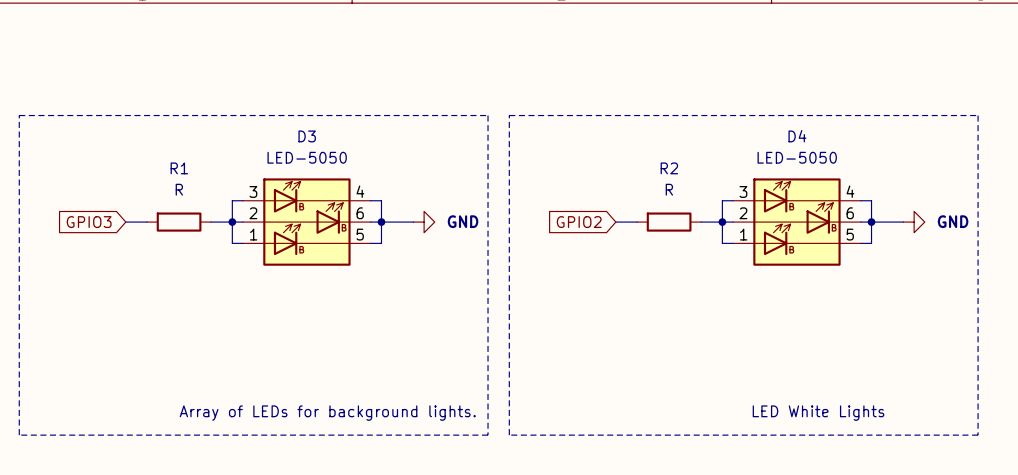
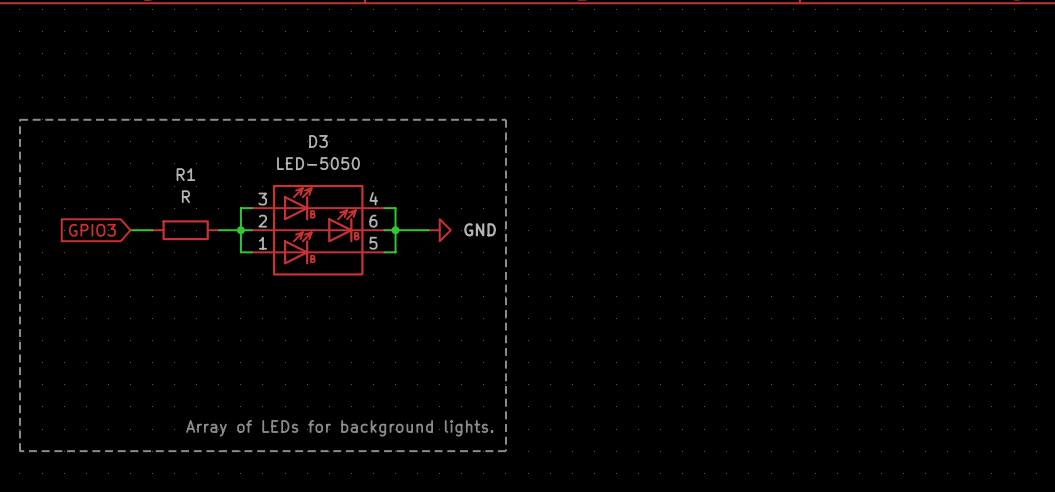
line: (509, 115) (978, 115) (978, 435) (509, 435) (509, 115) -> none
wire: (733, 200) (722, 200) (722, 243) (733, 243) -> none
wire: (860, 200) (871, 200) (871, 243) (860, 243) -> none
global label: GPIO2 (579, 222) -> none
wire: (615, 222) (637, 222) -> none
R2: R (669, 222) -> none
wire: (701, 222) (733, 222) -> none
junction: (722, 222) -> none
D4: LED-5050 (796, 222) -> none
wire: (860, 222) (903, 222) -> none
junction: (871, 222) -> none
power symbol: GND (914, 222) -> none
text: LED White Lights (818, 413) -> none

